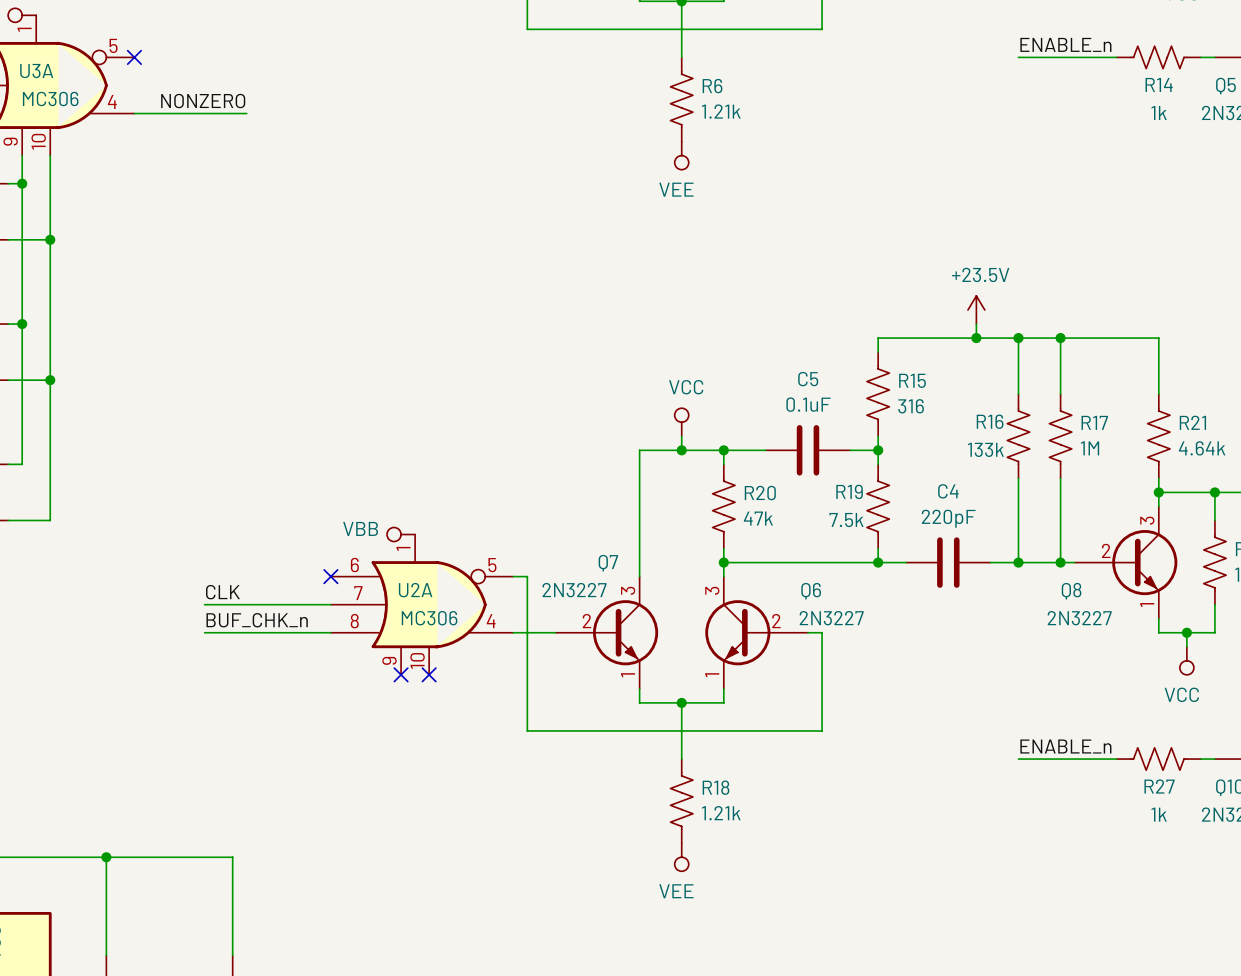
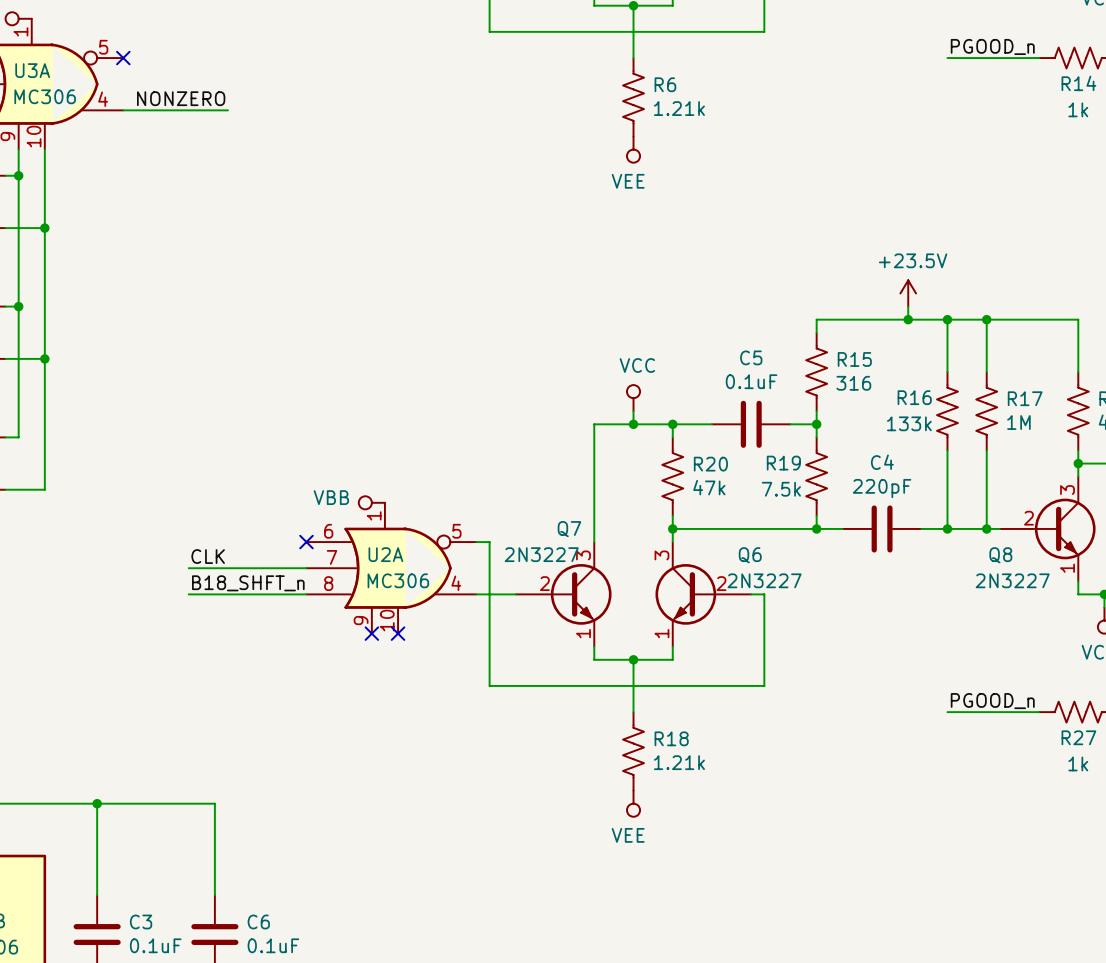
label: ENABLE_n (1065, 44) -> PGOOD_n (992, 46)
label: BUF_CHK_n (257, 620) -> B18_SHFT_n (248, 583)
label: ENABLE_n (1065, 746) -> PGOOD_n (992, 701)

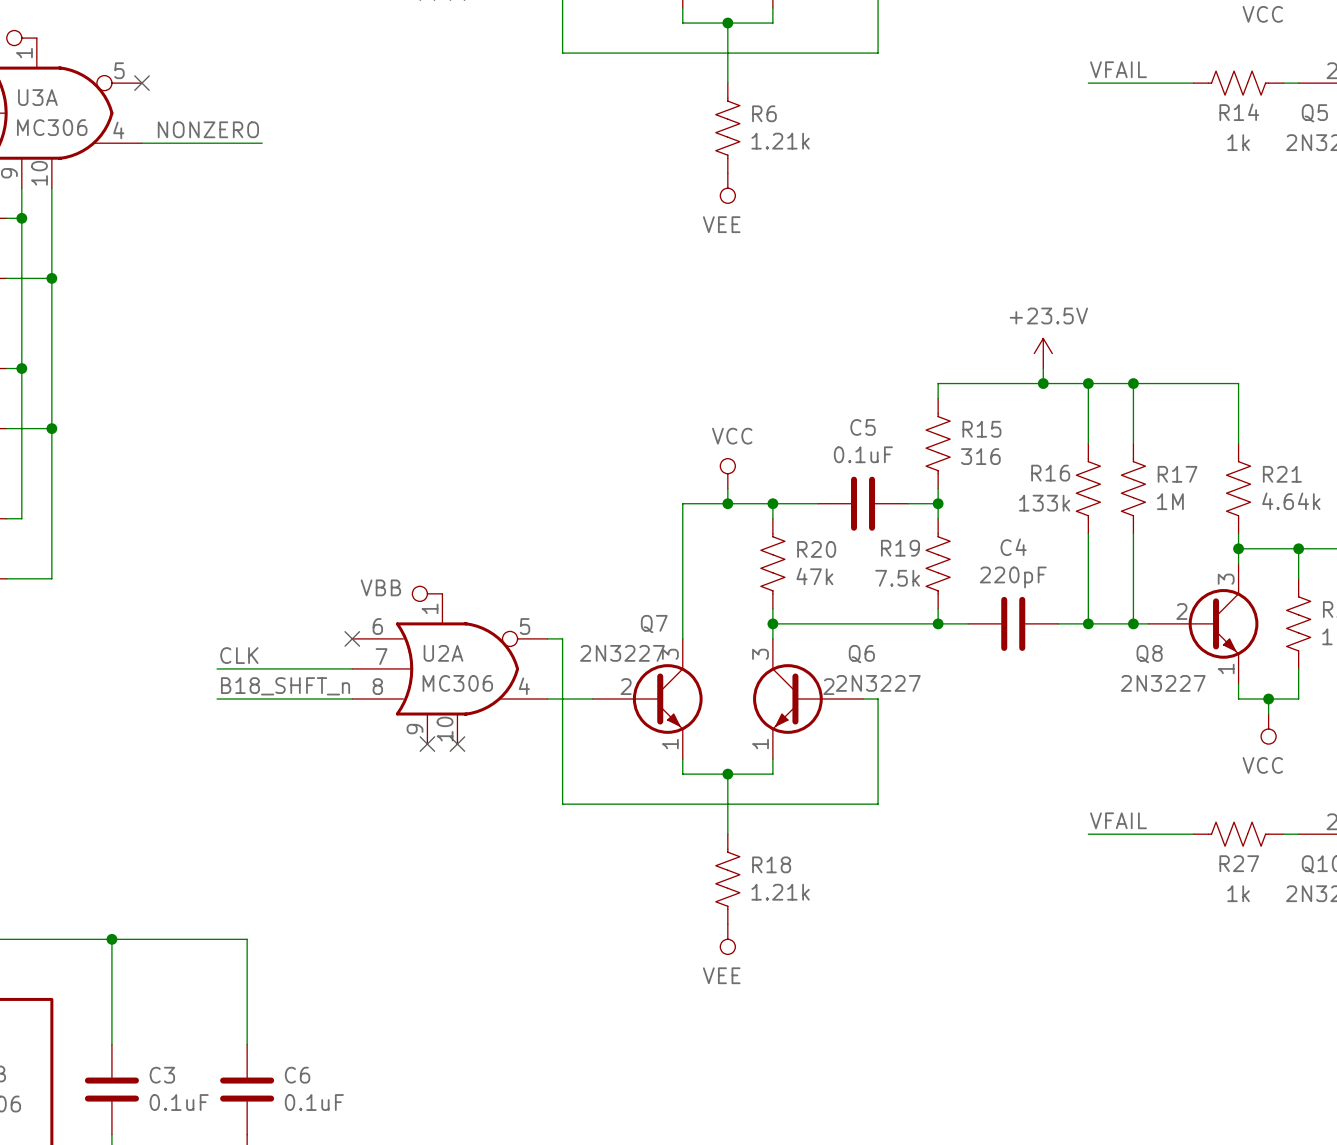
label: PGOOD_n (992, 46) -> VFAIL (1118, 69)
label: PGOOD_n (992, 701) -> VFAIL (1118, 820)

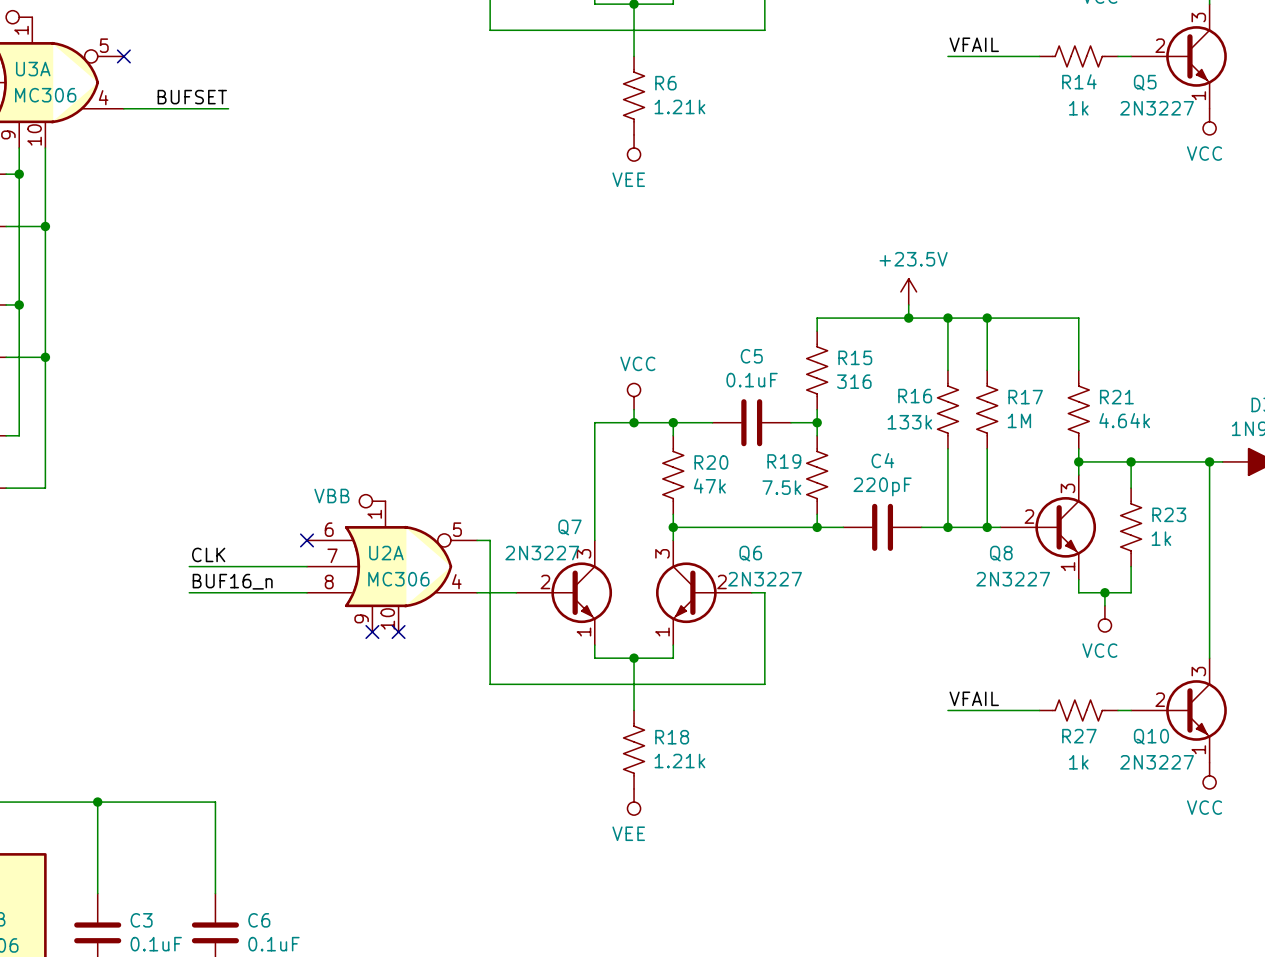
label: NONZERO (208, 129) -> BUFSET (192, 97)
label: B18_SHFT_n (285, 686) -> BUF16_n (232, 581)

